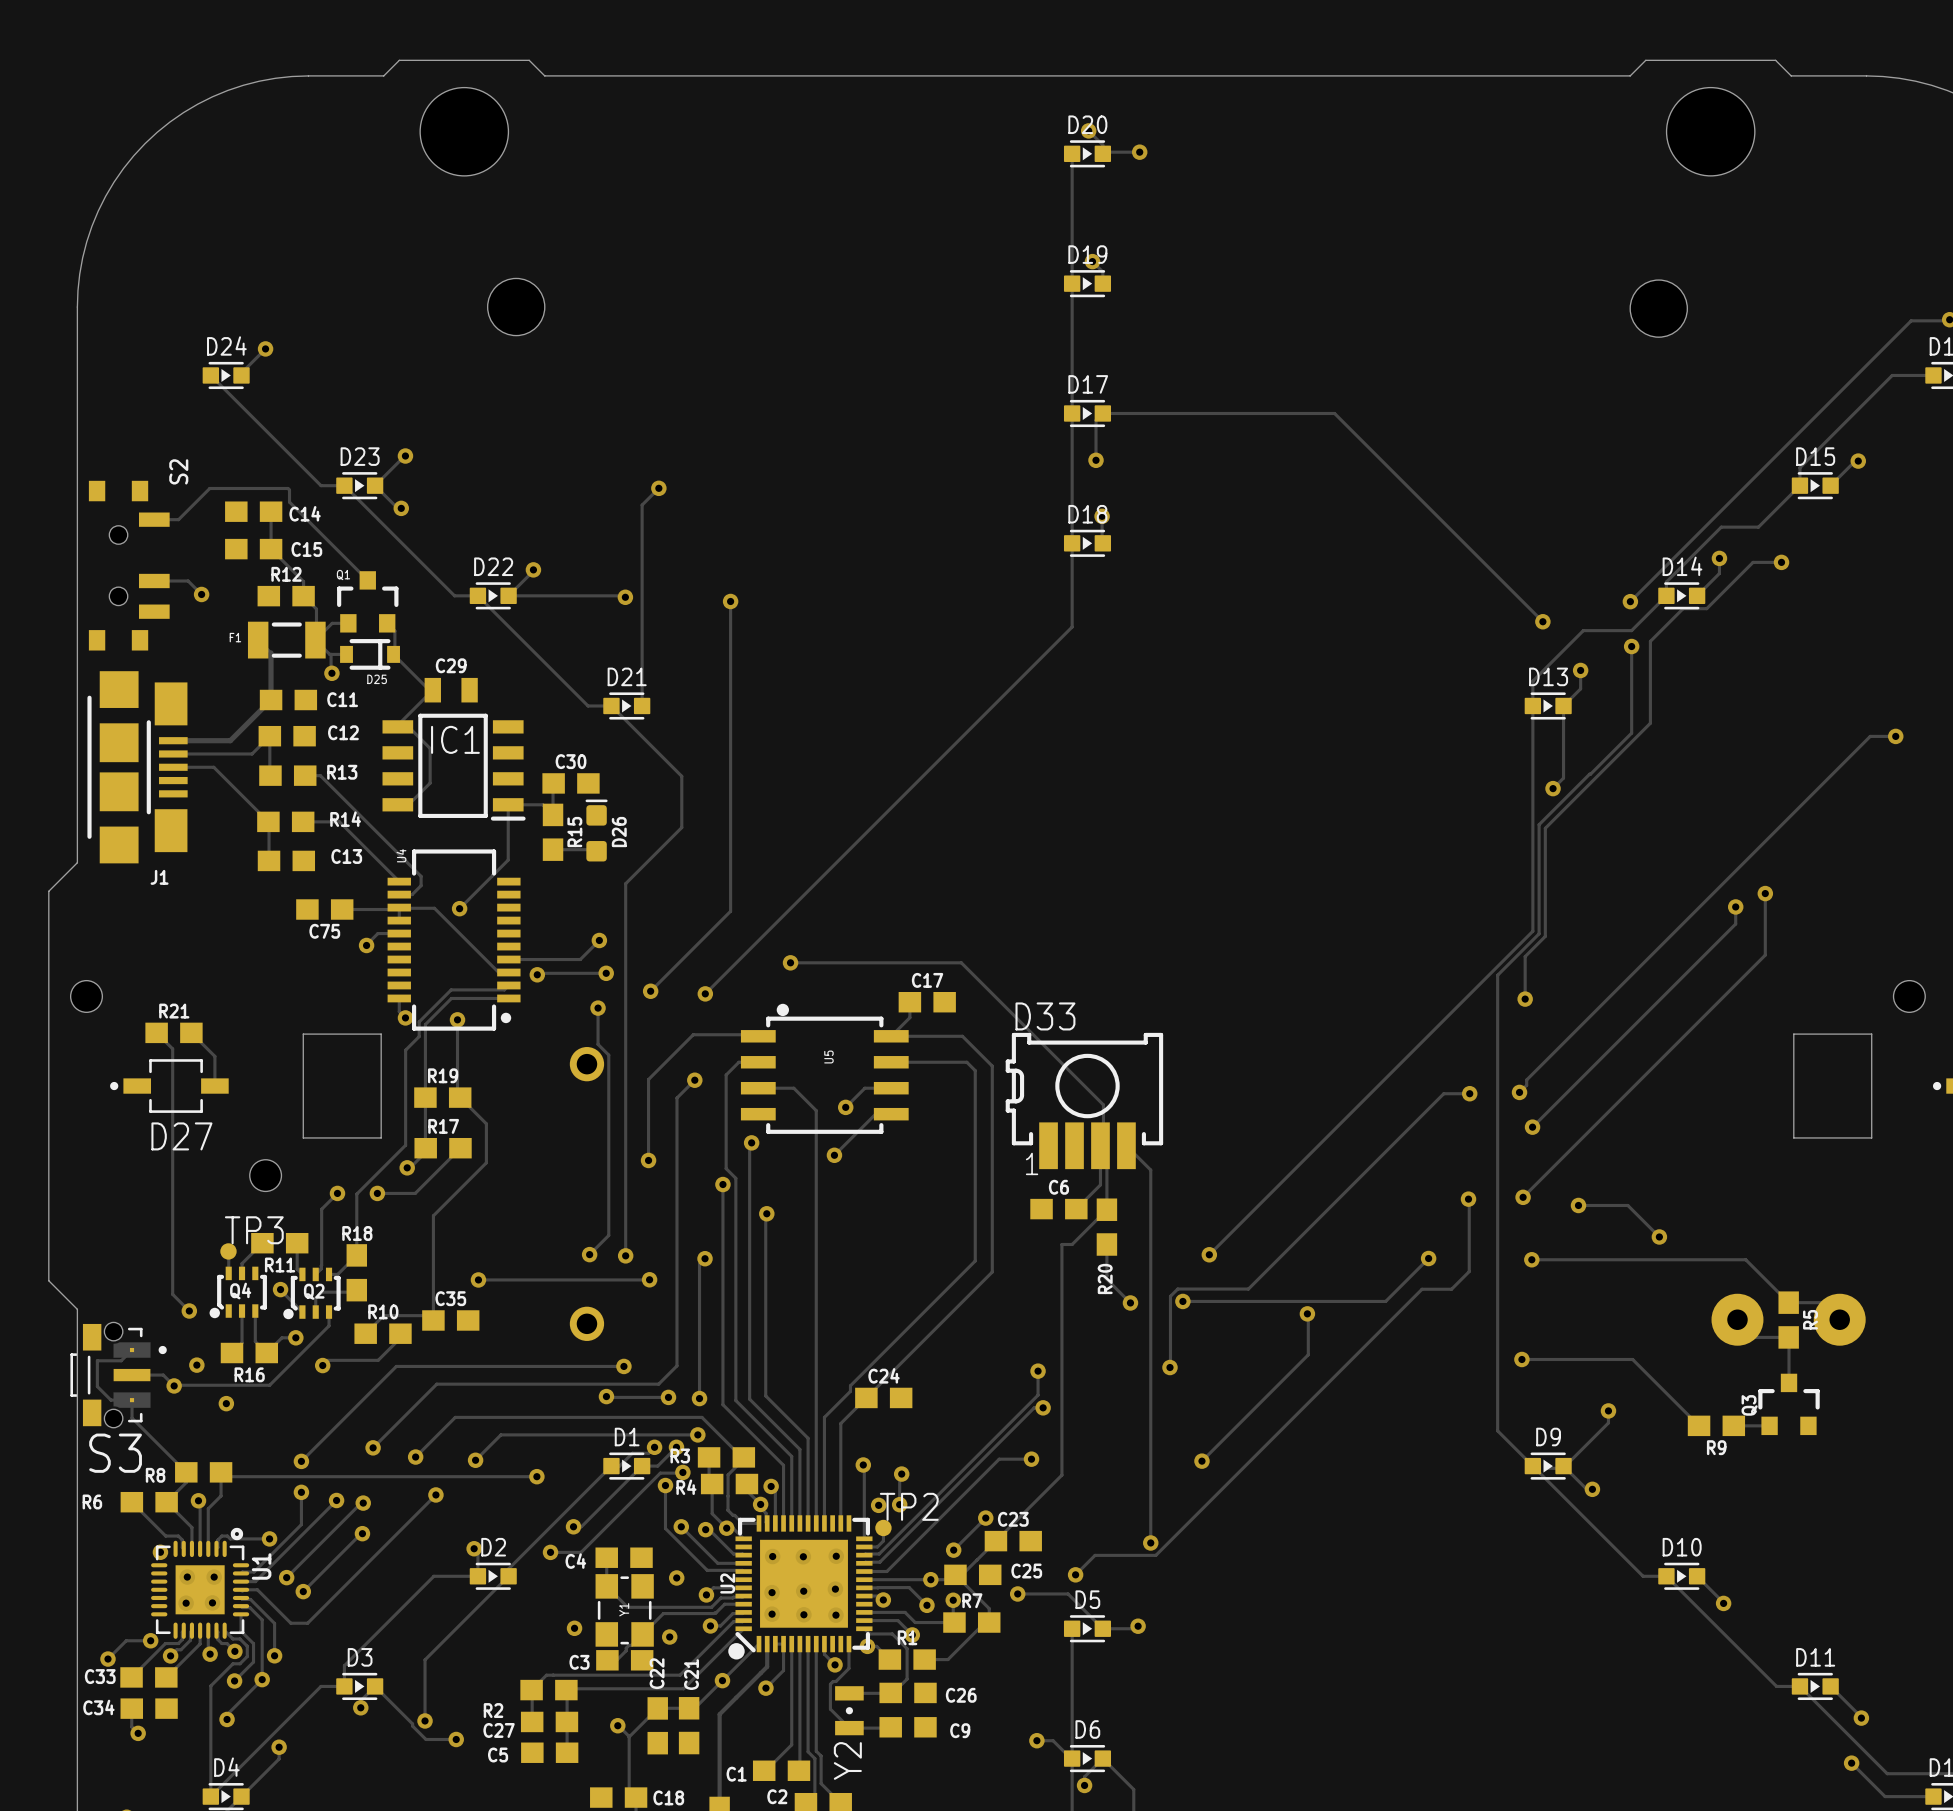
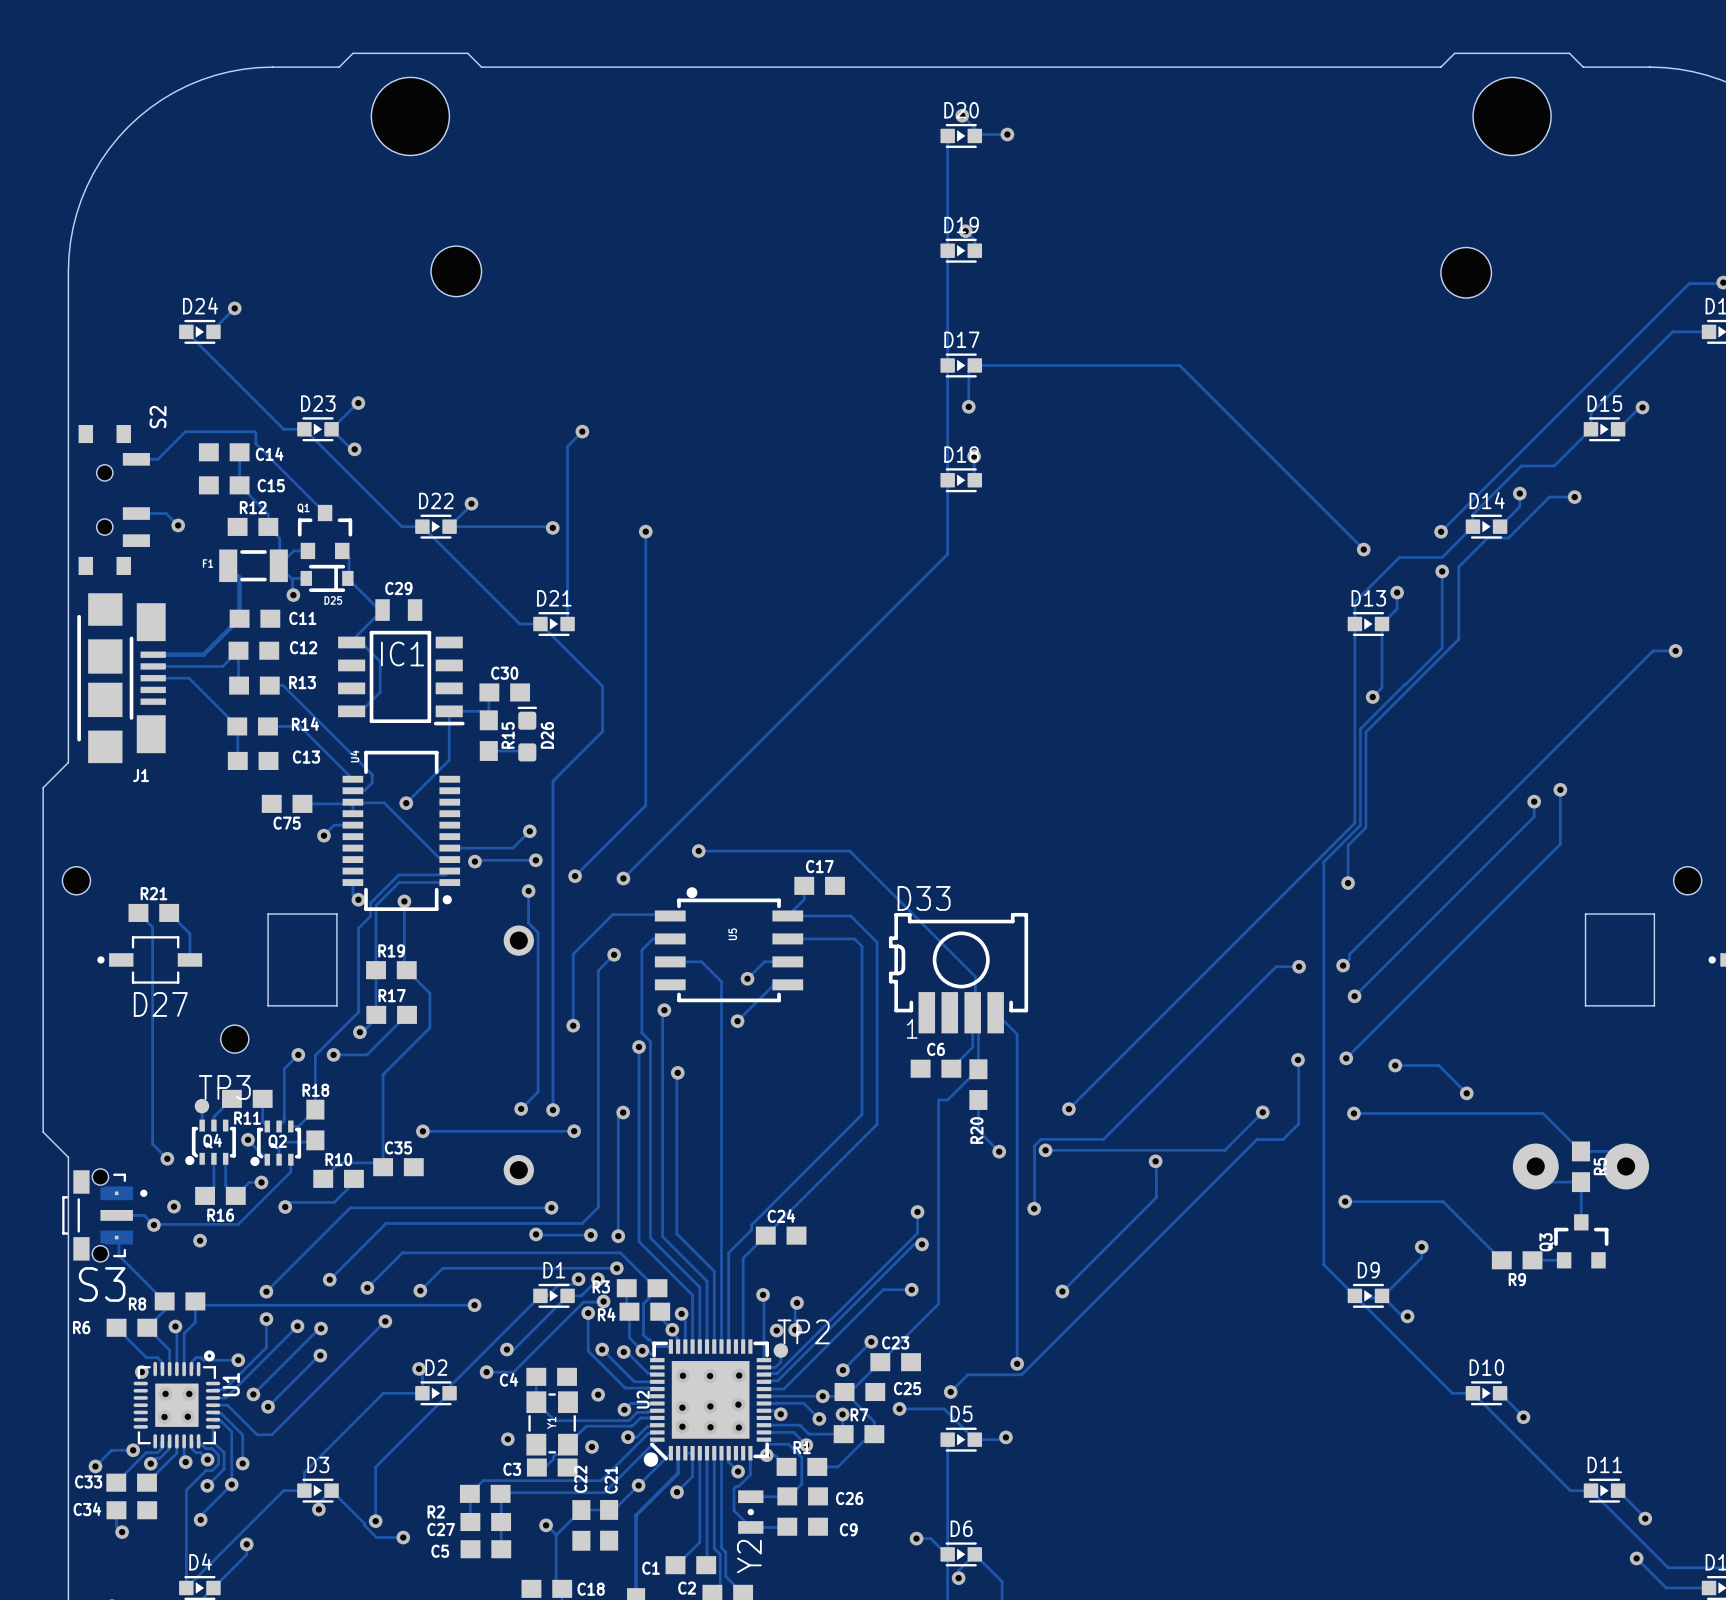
track: (137, 1344) (121, 1360) (97, 1360) (97, 1386) (110, 1400) (132, 1400) (132, 1418) (134, 1420) -> (118, 1237) (118, 1255)

